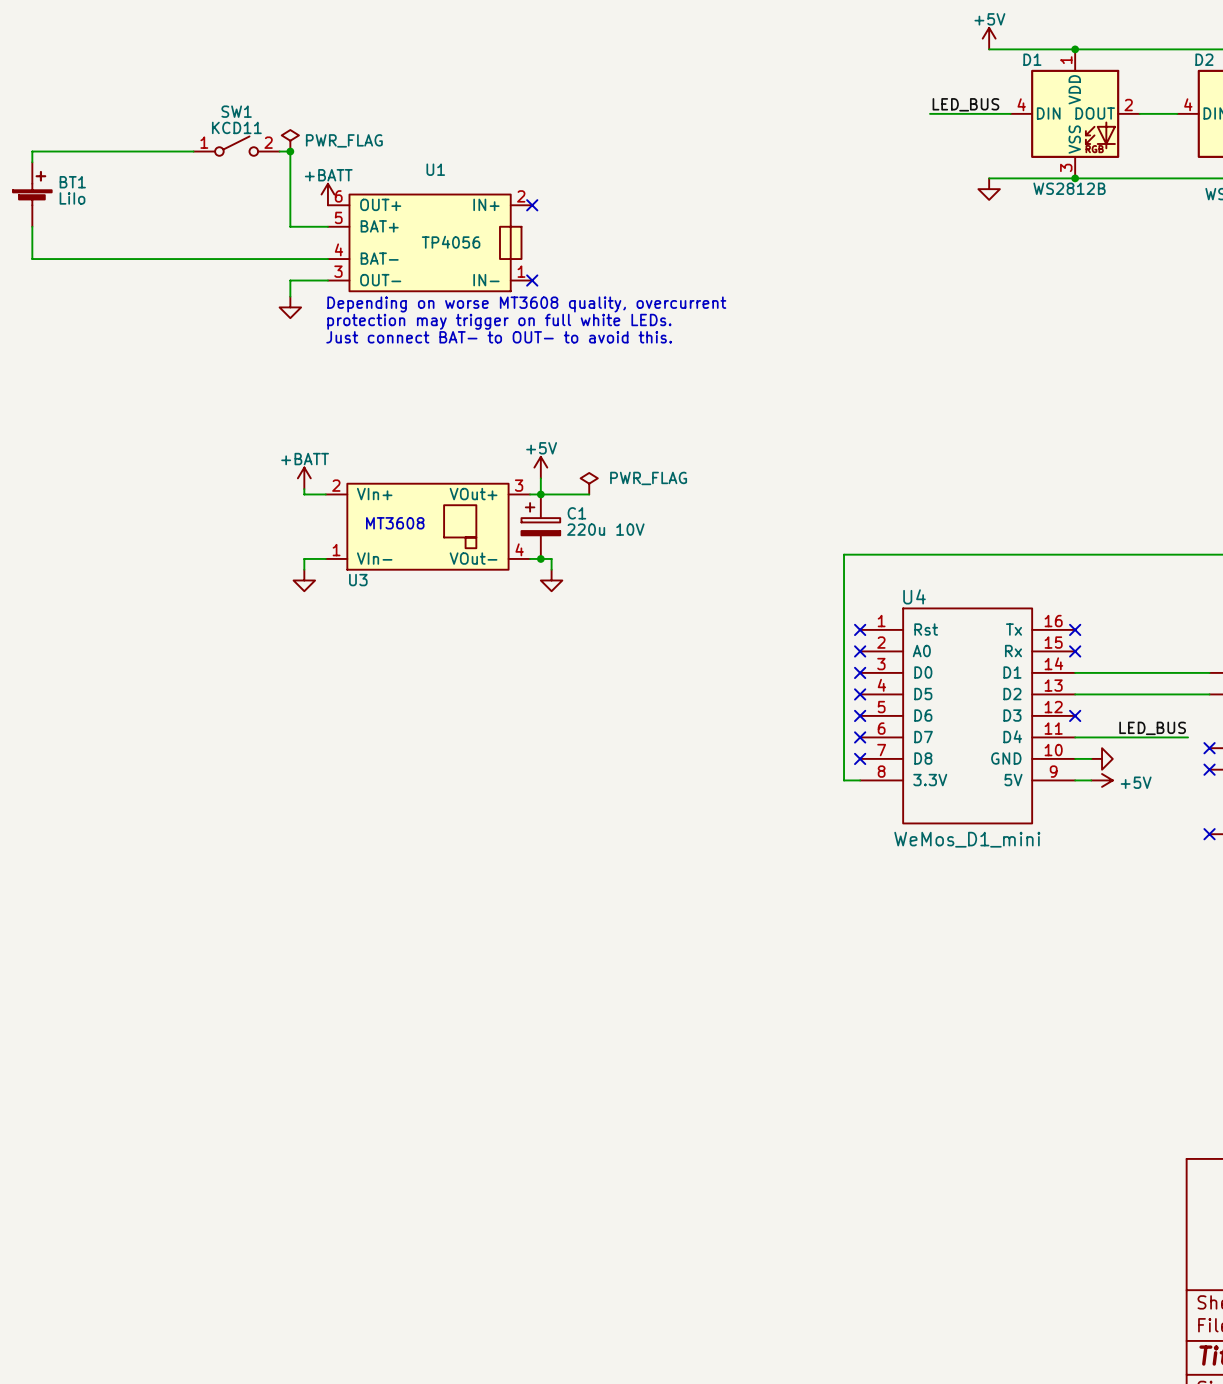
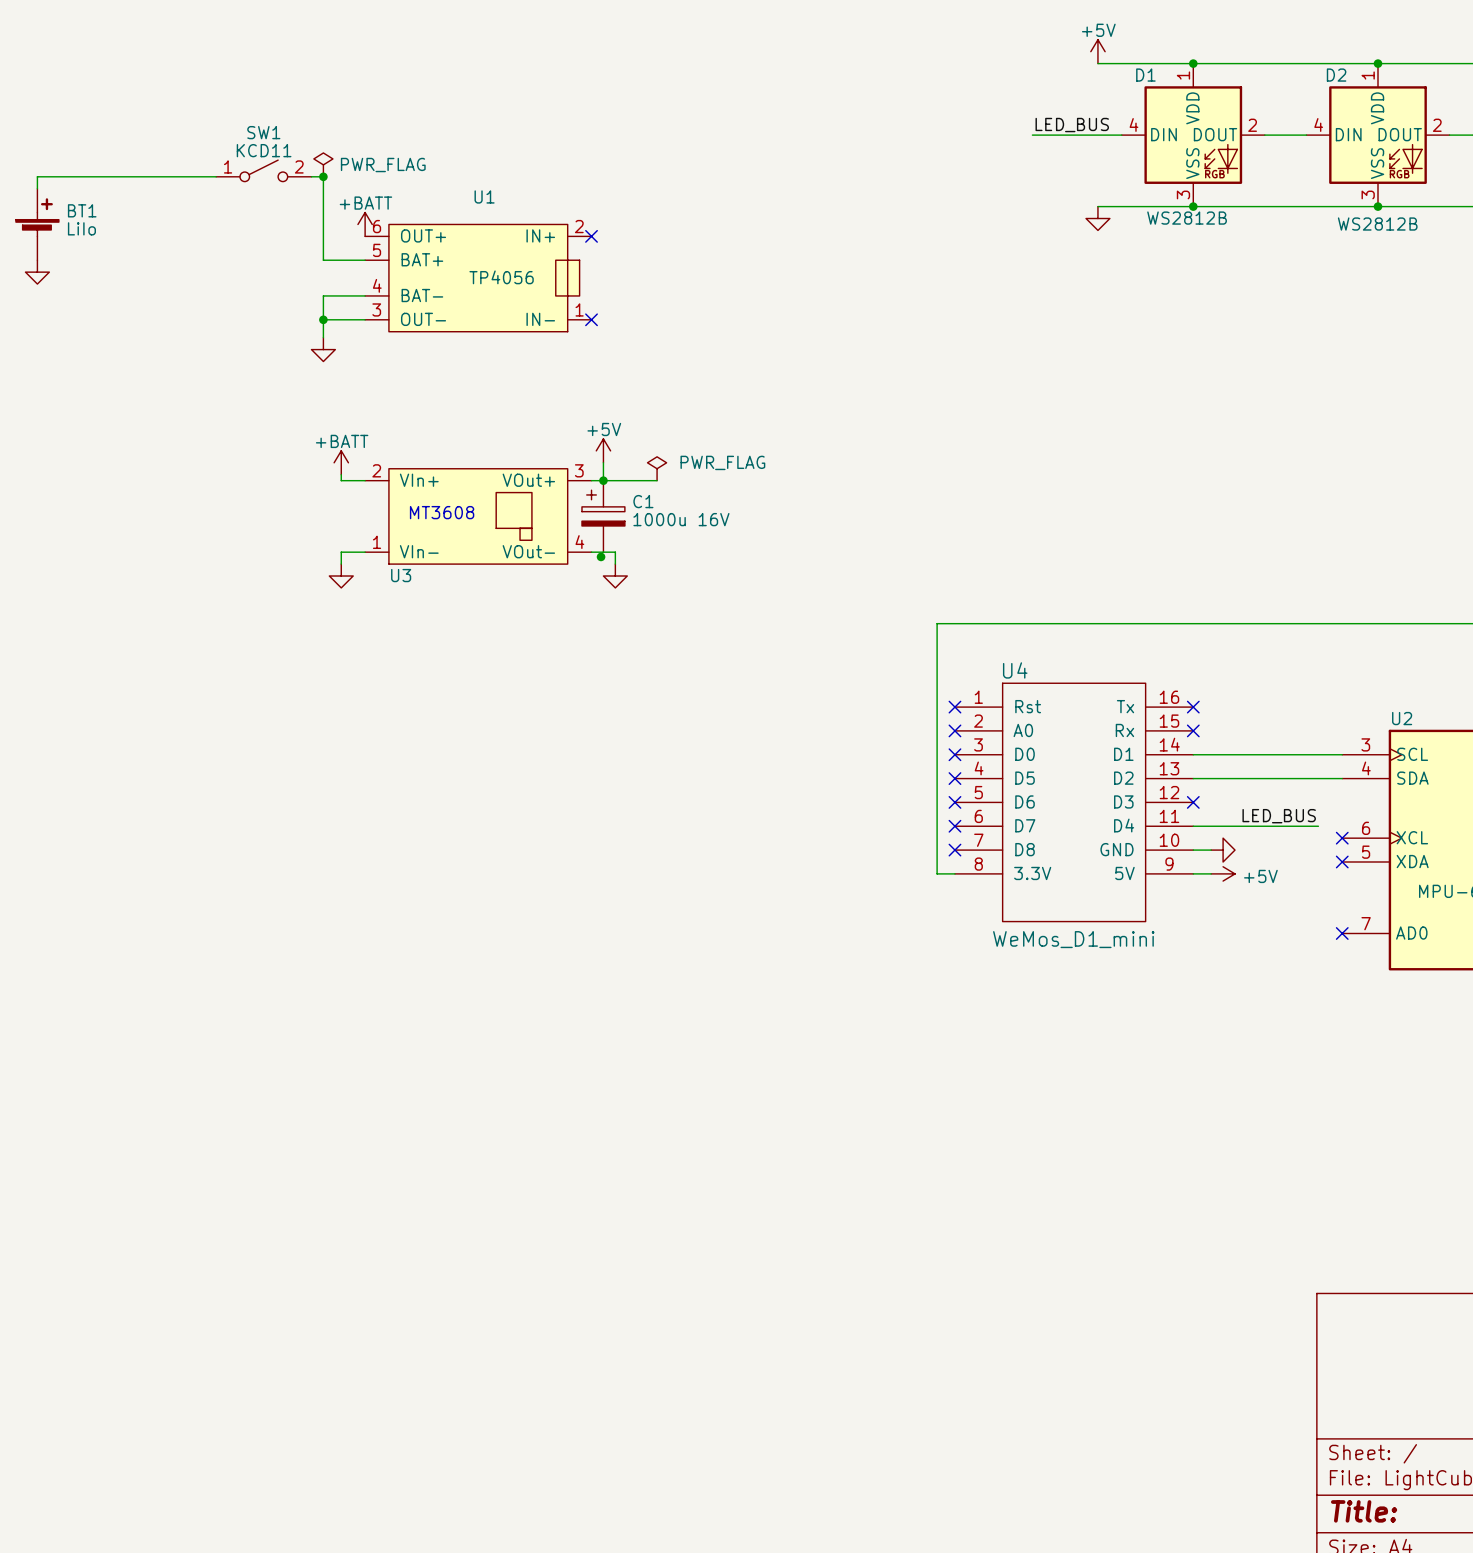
wire: (32, 226) (32, 259) (290, 259) -> (323, 319) (323, 295)
power symbol: none -> (37, 272)
junction: none -> (323, 319)
text: Depending on worse MT3608 quality, overcurrent (526, 304) -> none
text: protection may trigger on full white LEDs. (499, 321) -> none
text: Just connect BAT- to OUT- to avoid this. (499, 337) -> none
junction: none -> (603, 480)
power symbol position: +5V (540, 467) -> +5V (603, 450)
power symbol position: +BATT (304, 478) -> +BATT (341, 462)
wire: (540, 478) (540, 494) -> (603, 462) (603, 480)
power symbol position: PWR_FLAG (589, 483) -> PWR_FLAG (657, 468)
wire: (304, 489) (304, 494) (325, 494) -> (341, 474) (341, 480) (365, 480)
wire: (530, 494) (589, 494) -> (591, 480) (657, 480)
text position: MT3608 (395, 523) -> MT3608 (442, 512)
U3 position: (427, 526) -> (478, 516)
C1 position: (540, 526) -> (603, 516)
C1 value: 220u 10V (605, 529) -> 1000u 16V (681, 519)
wire: (325, 558) (304, 558) (304, 569) -> (365, 552) (341, 552) (341, 564)
wire: (530, 558) (551, 558) (551, 569) -> (591, 552) (615, 552) (615, 564)
junction: (540, 558) -> none
power symbol position: (304, 580) -> (341, 576)
power symbol position: (551, 580) -> (615, 576)

